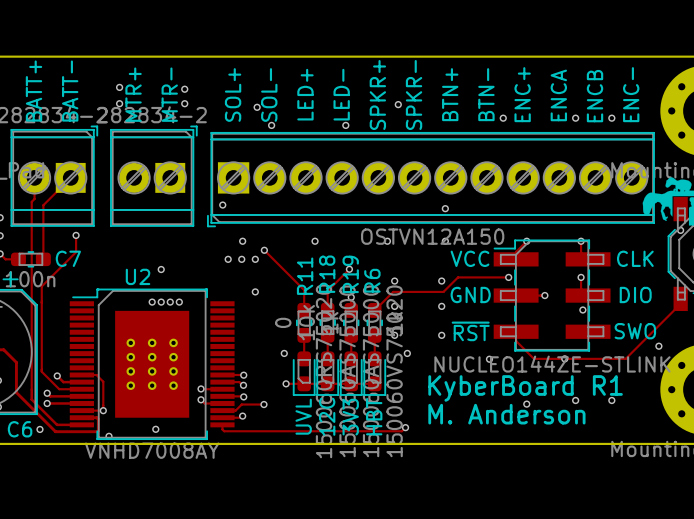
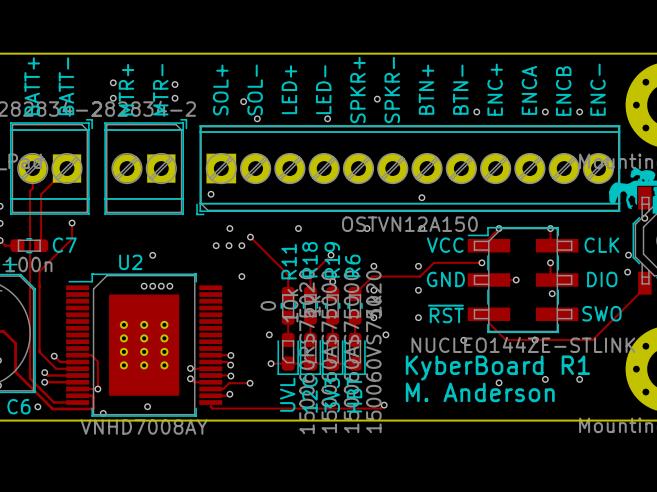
via: none -> (628, 255)
via: none -> (627, 272)
via: (658, 346) -> none

